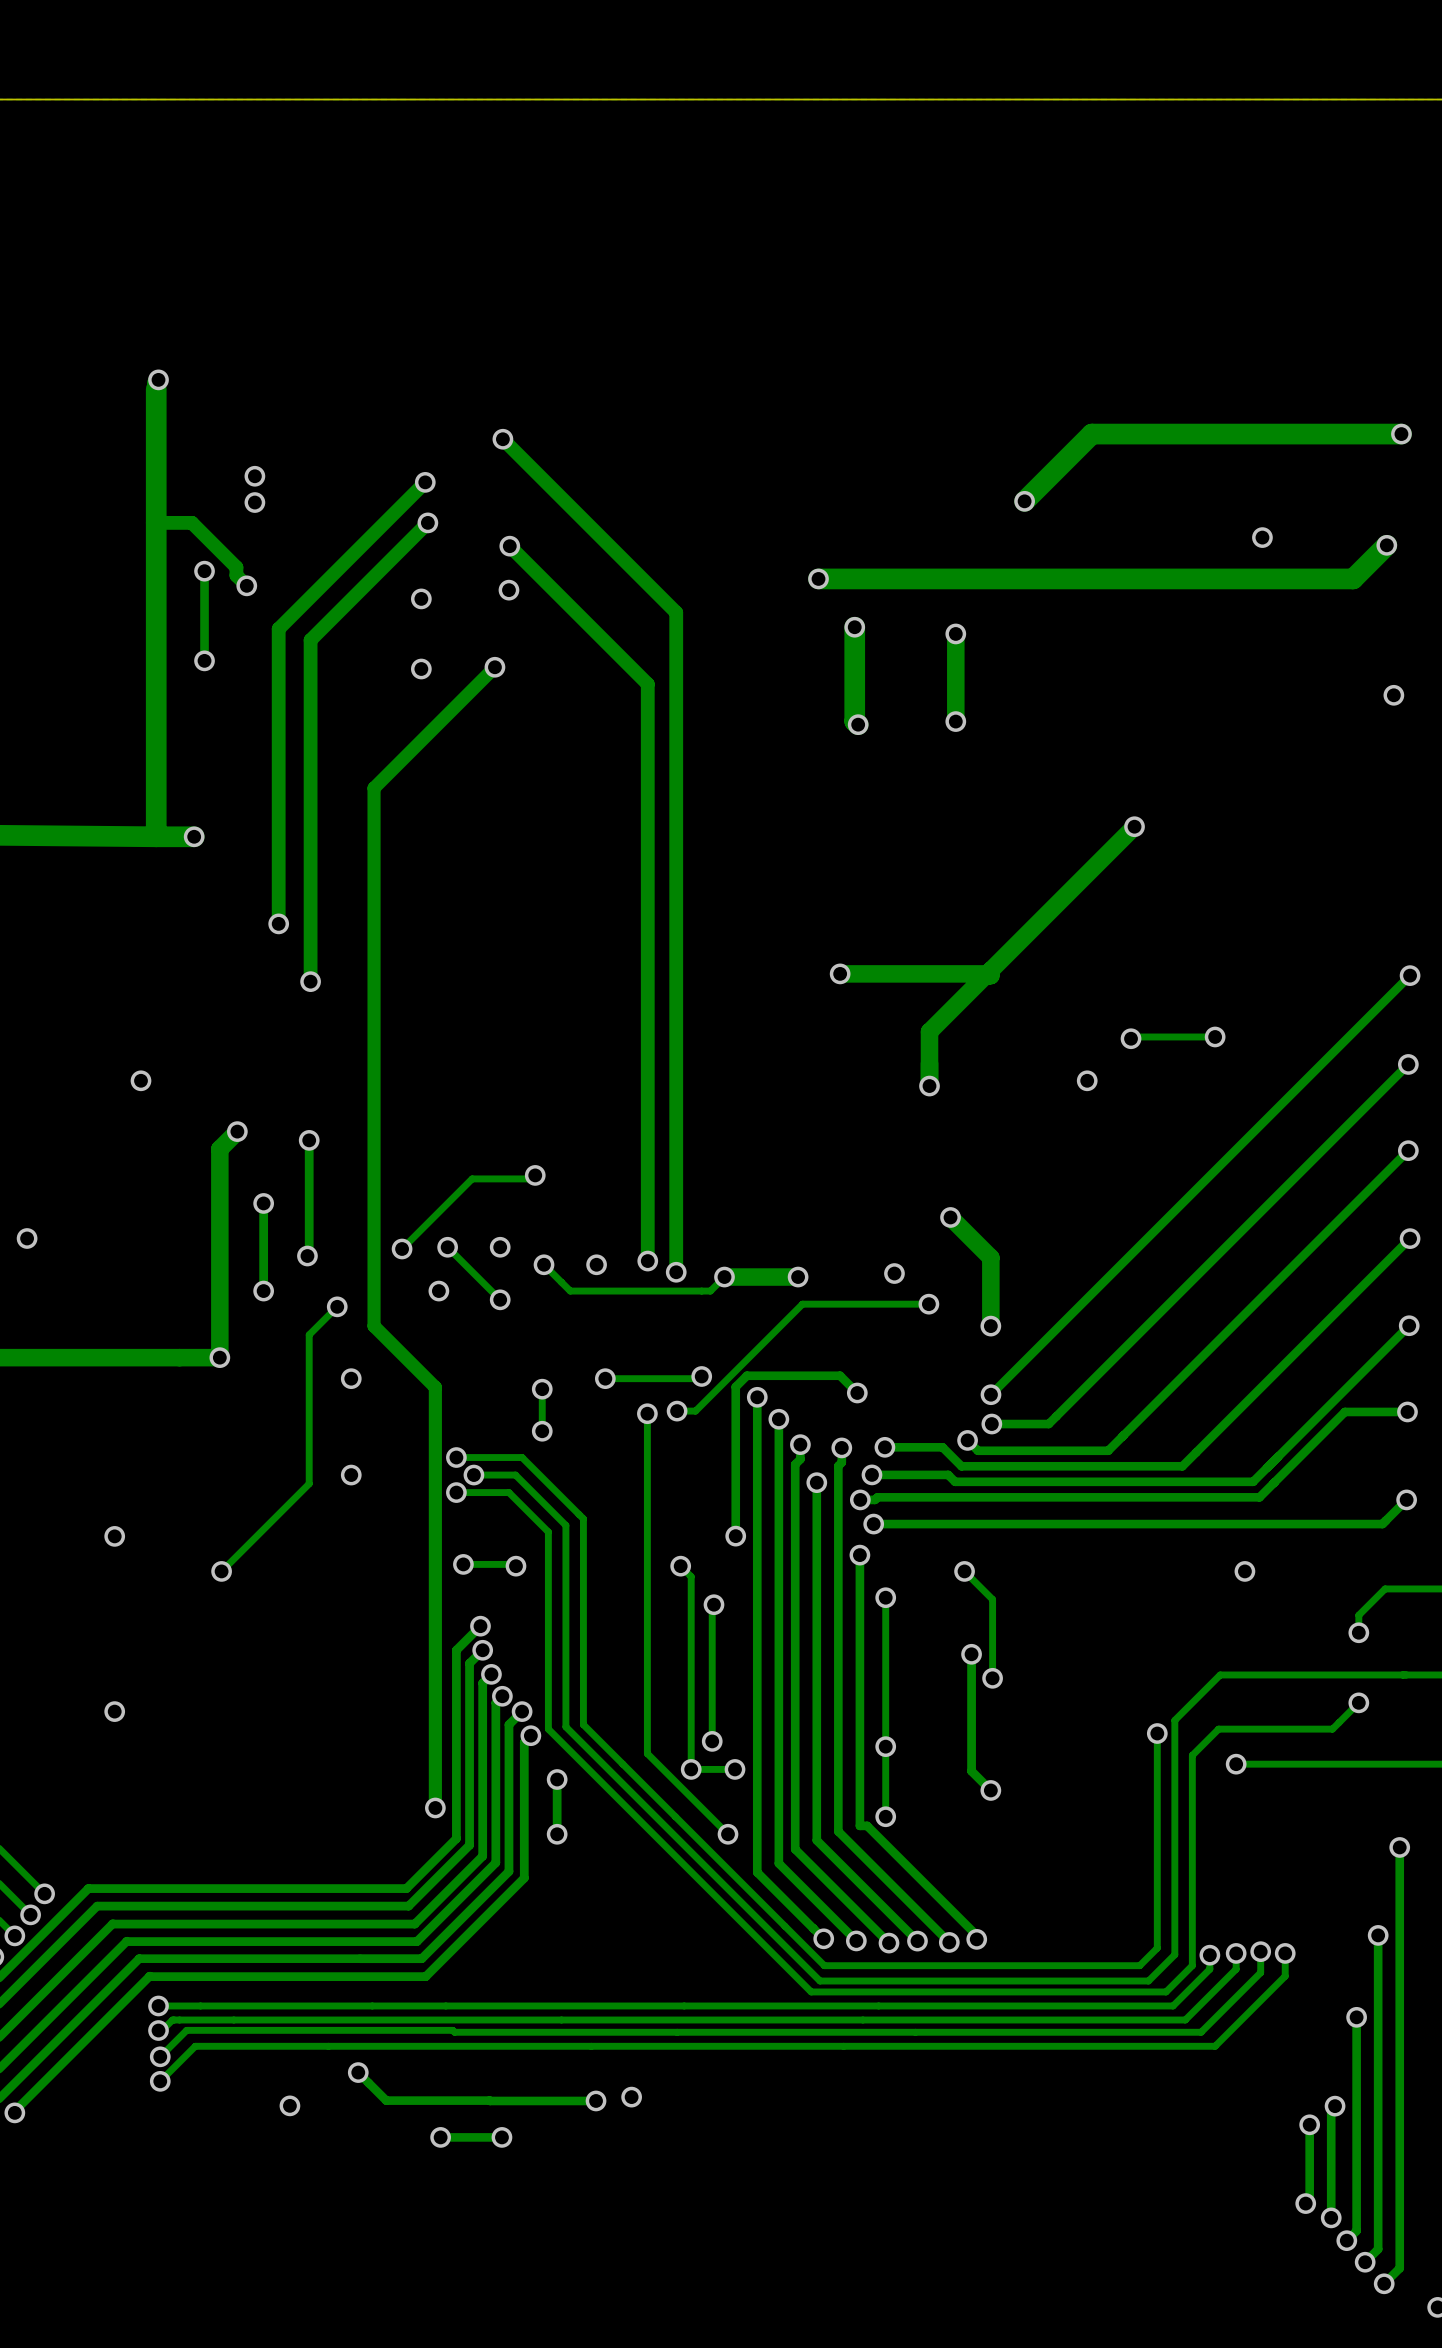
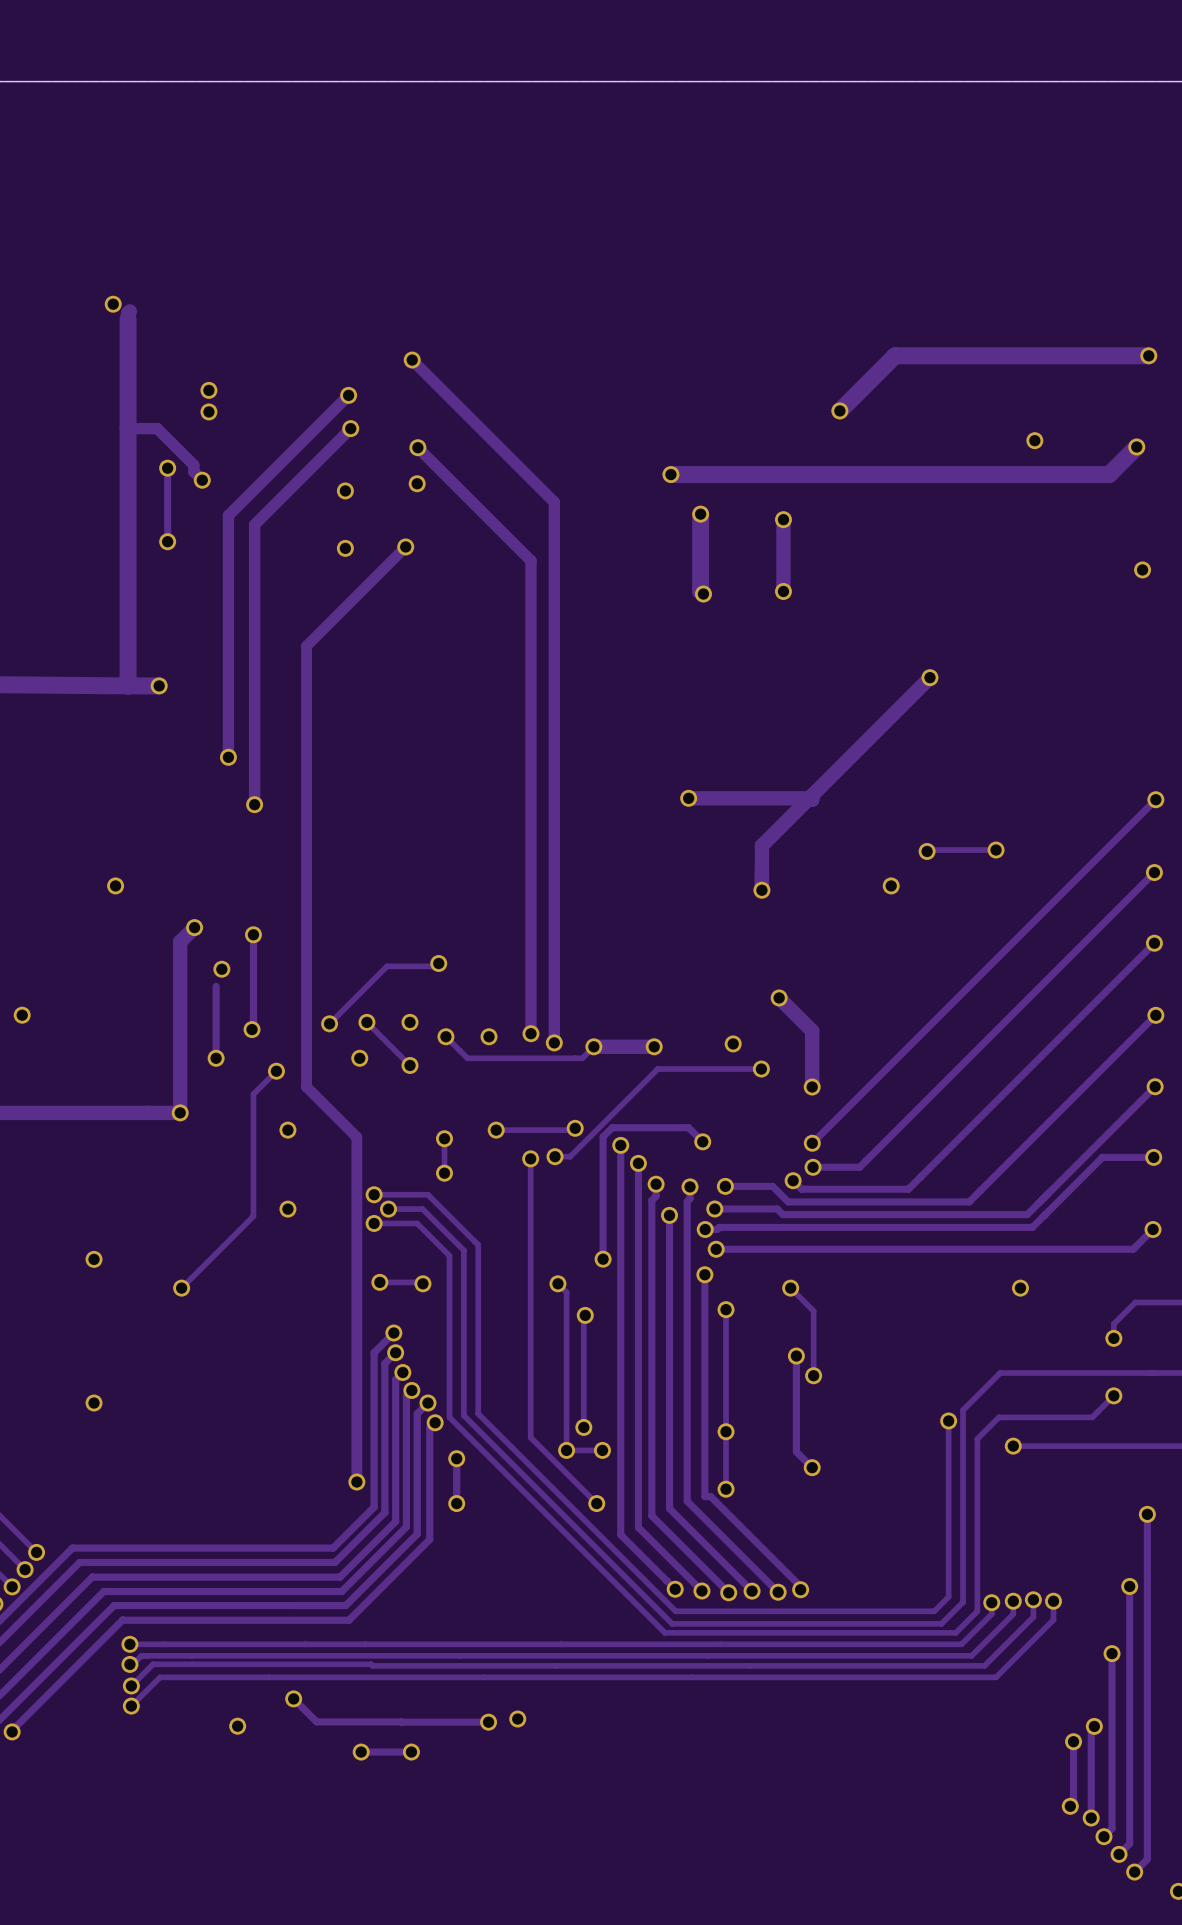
via position: (158, 379) -> (113, 304)
via position: (263, 1203) -> (221, 969)

